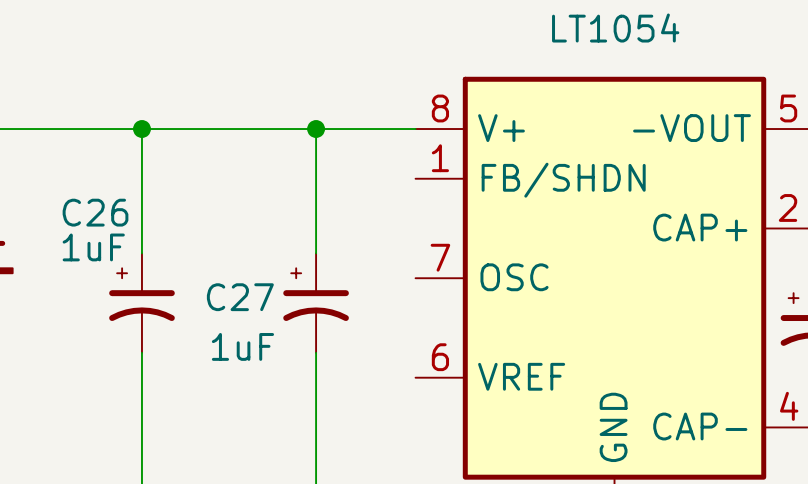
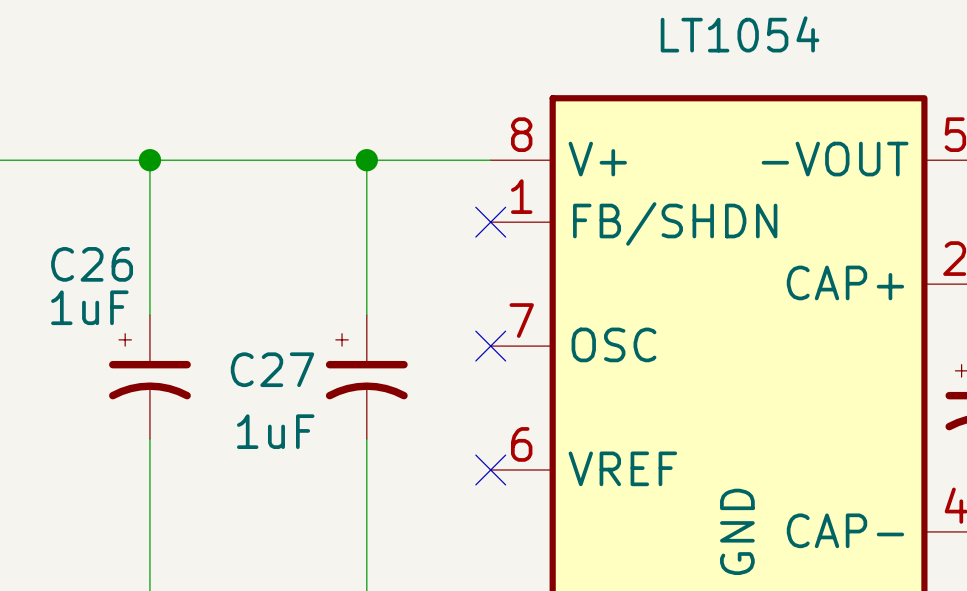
no-connect mark: none -> (490, 222)
no-connect mark: none -> (490, 346)
no-connect mark: none -> (490, 469)

